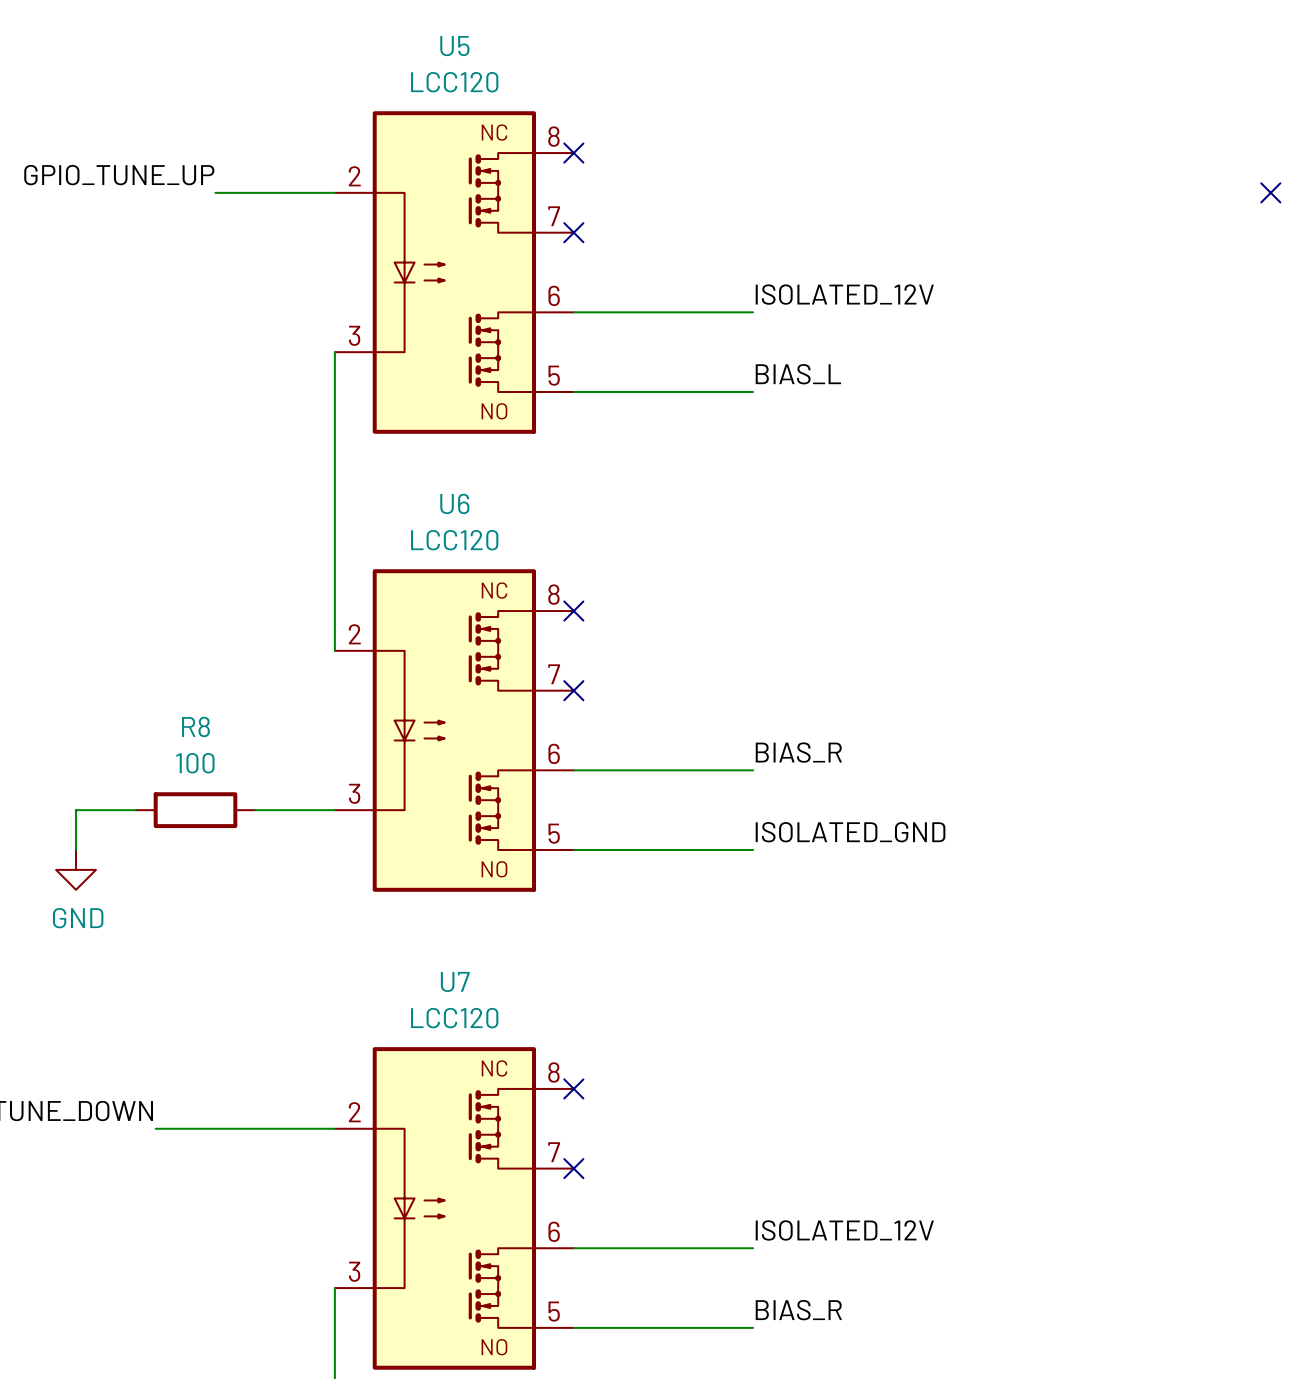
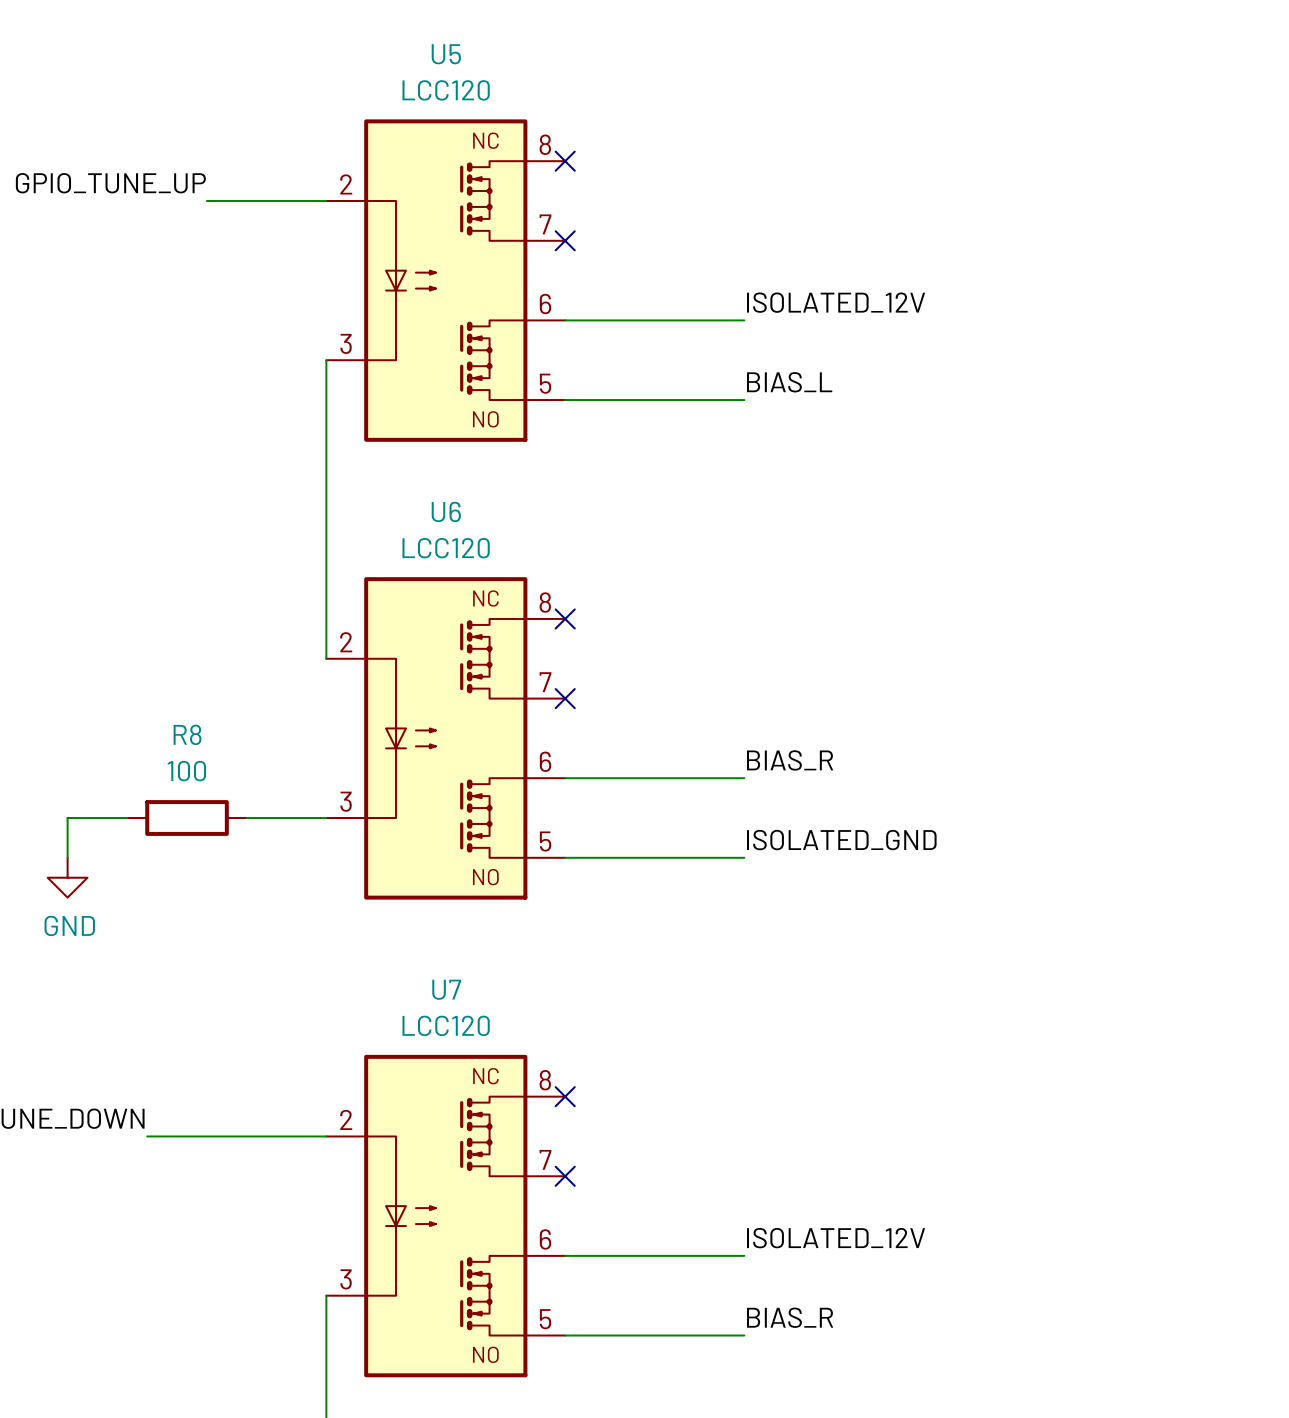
no-connect mark: (1270, 192) -> none

